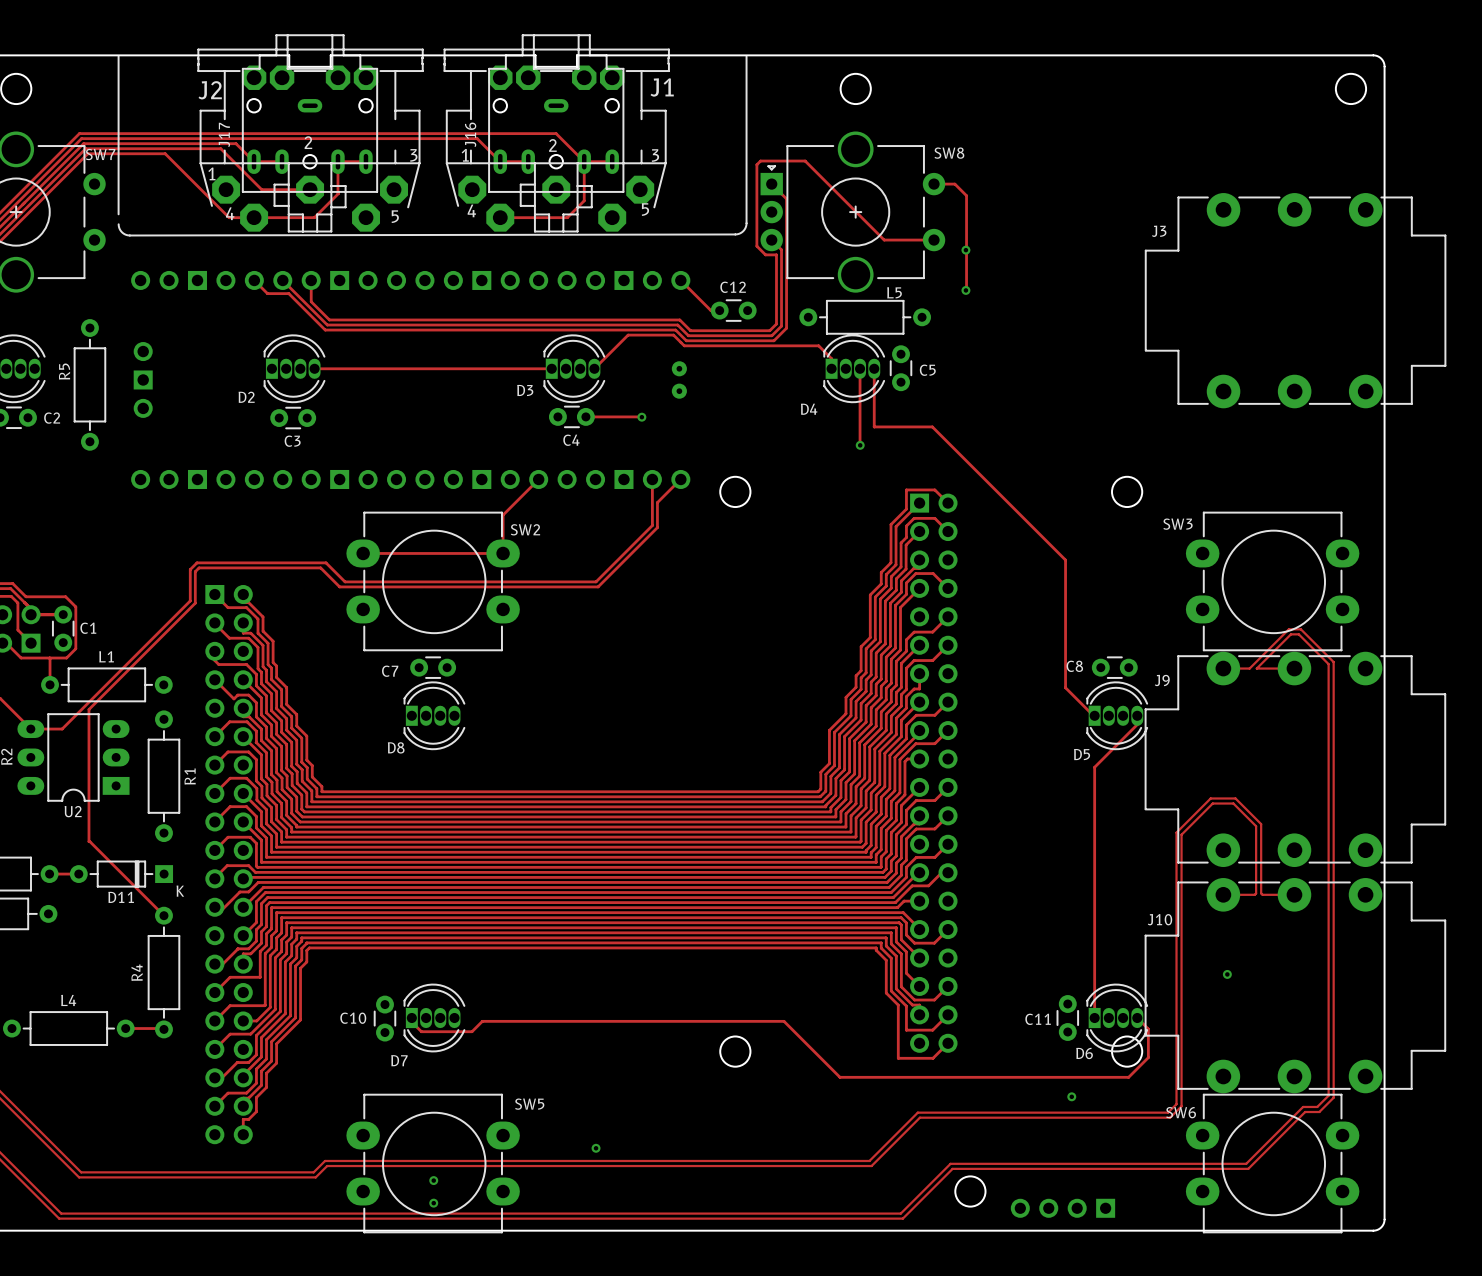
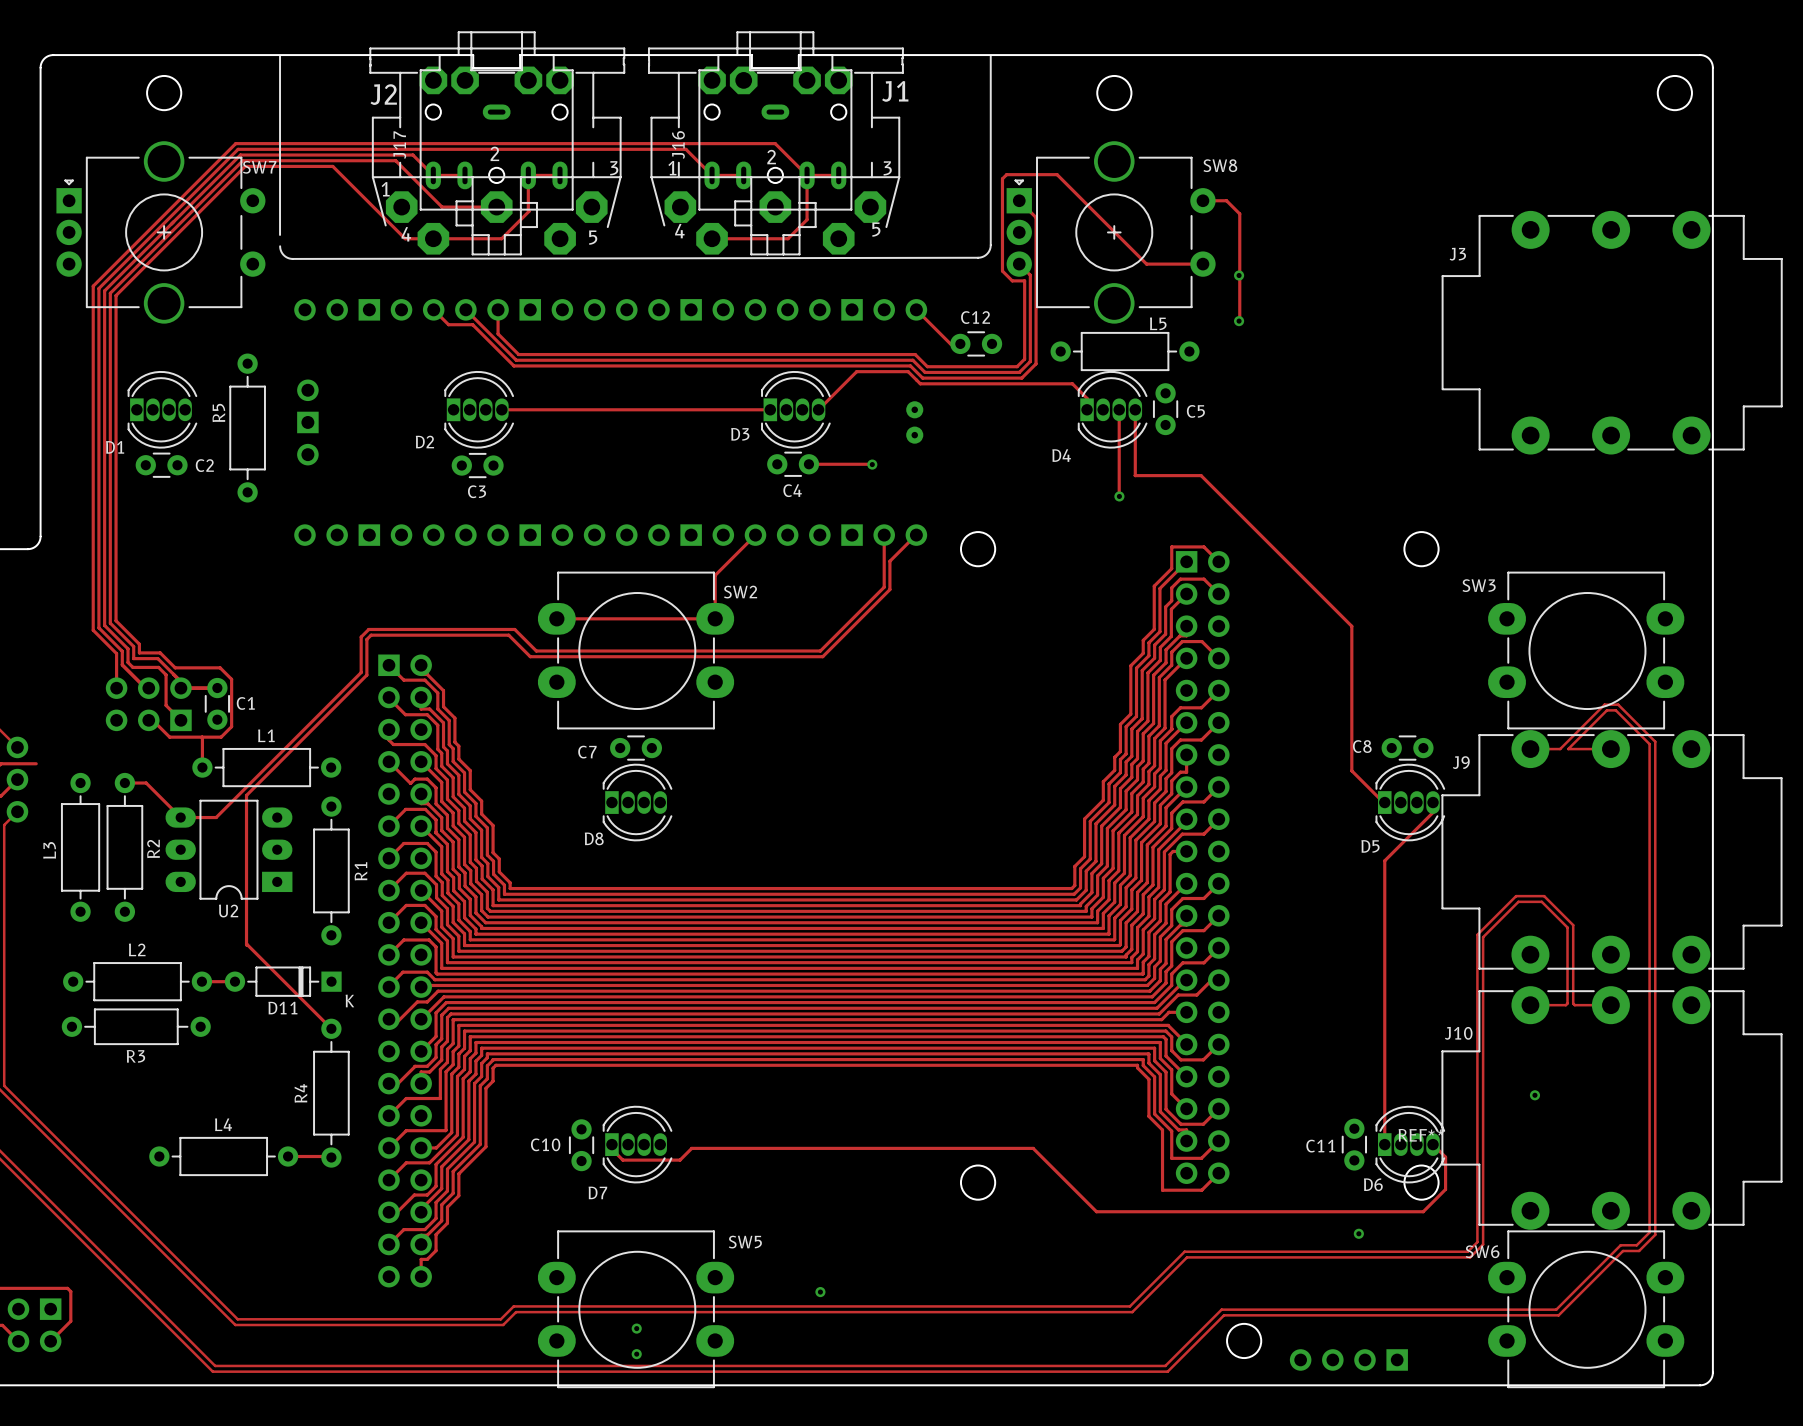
REF** name: none -> REF** (1421, 1135)

